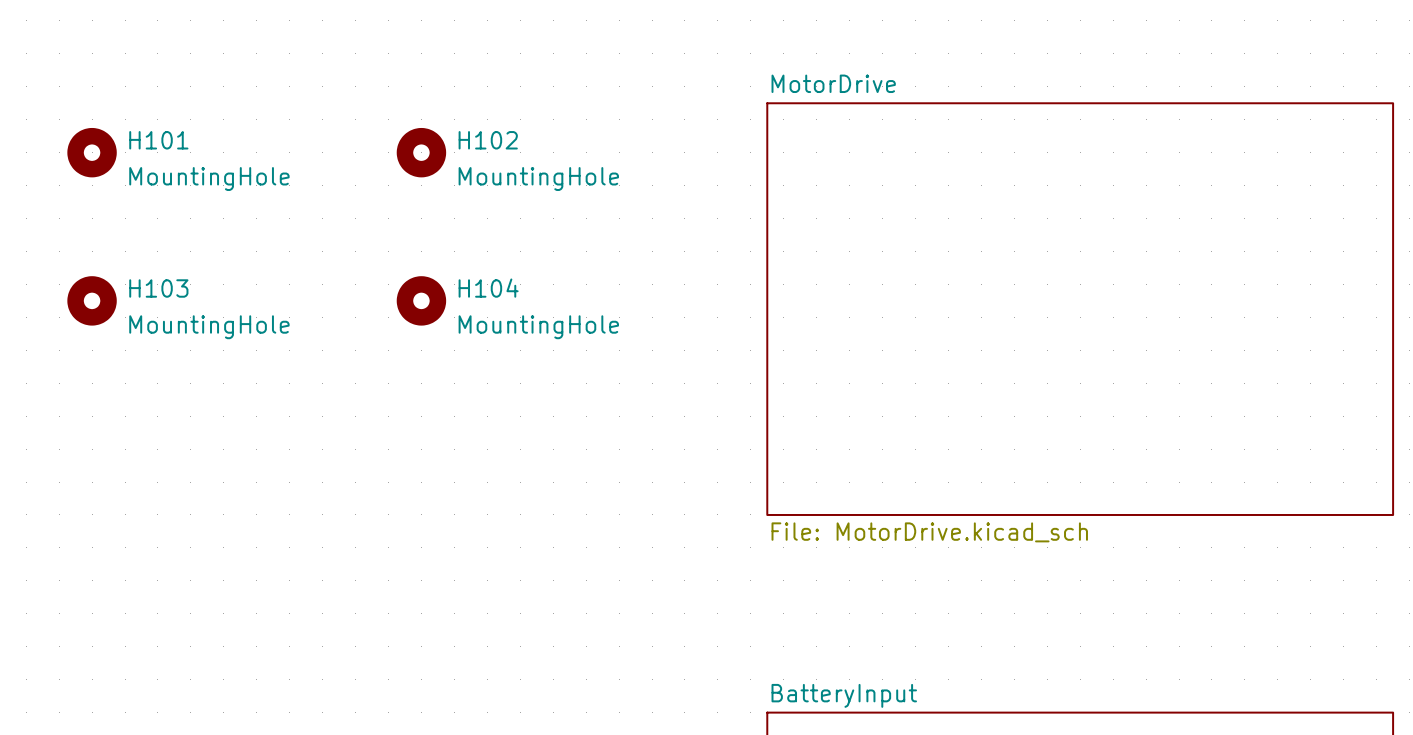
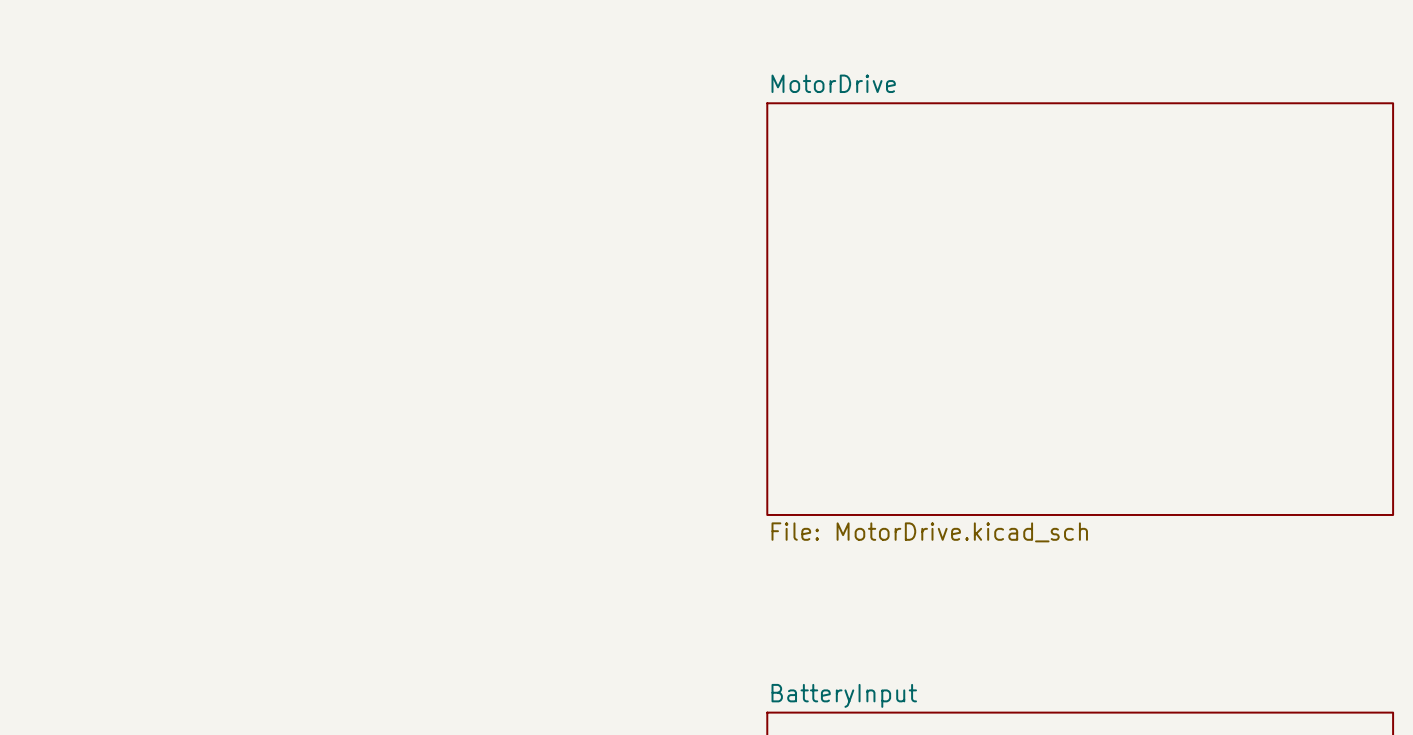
H101: MountingHole (92, 152) -> none
H102: MountingHole (421, 152) -> none
H103: MountingHole (92, 300) -> none
H104: MountingHole (421, 300) -> none

